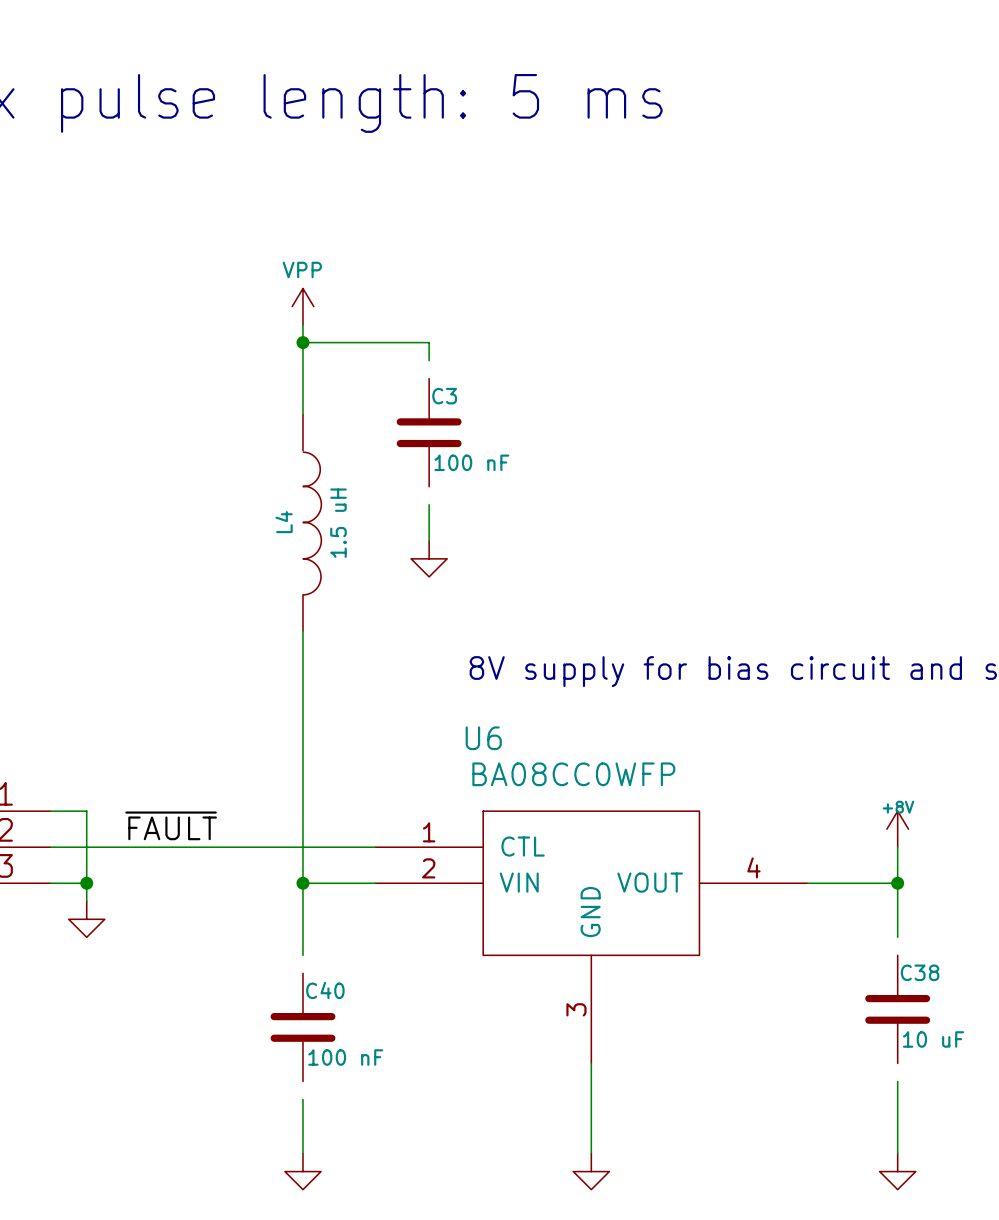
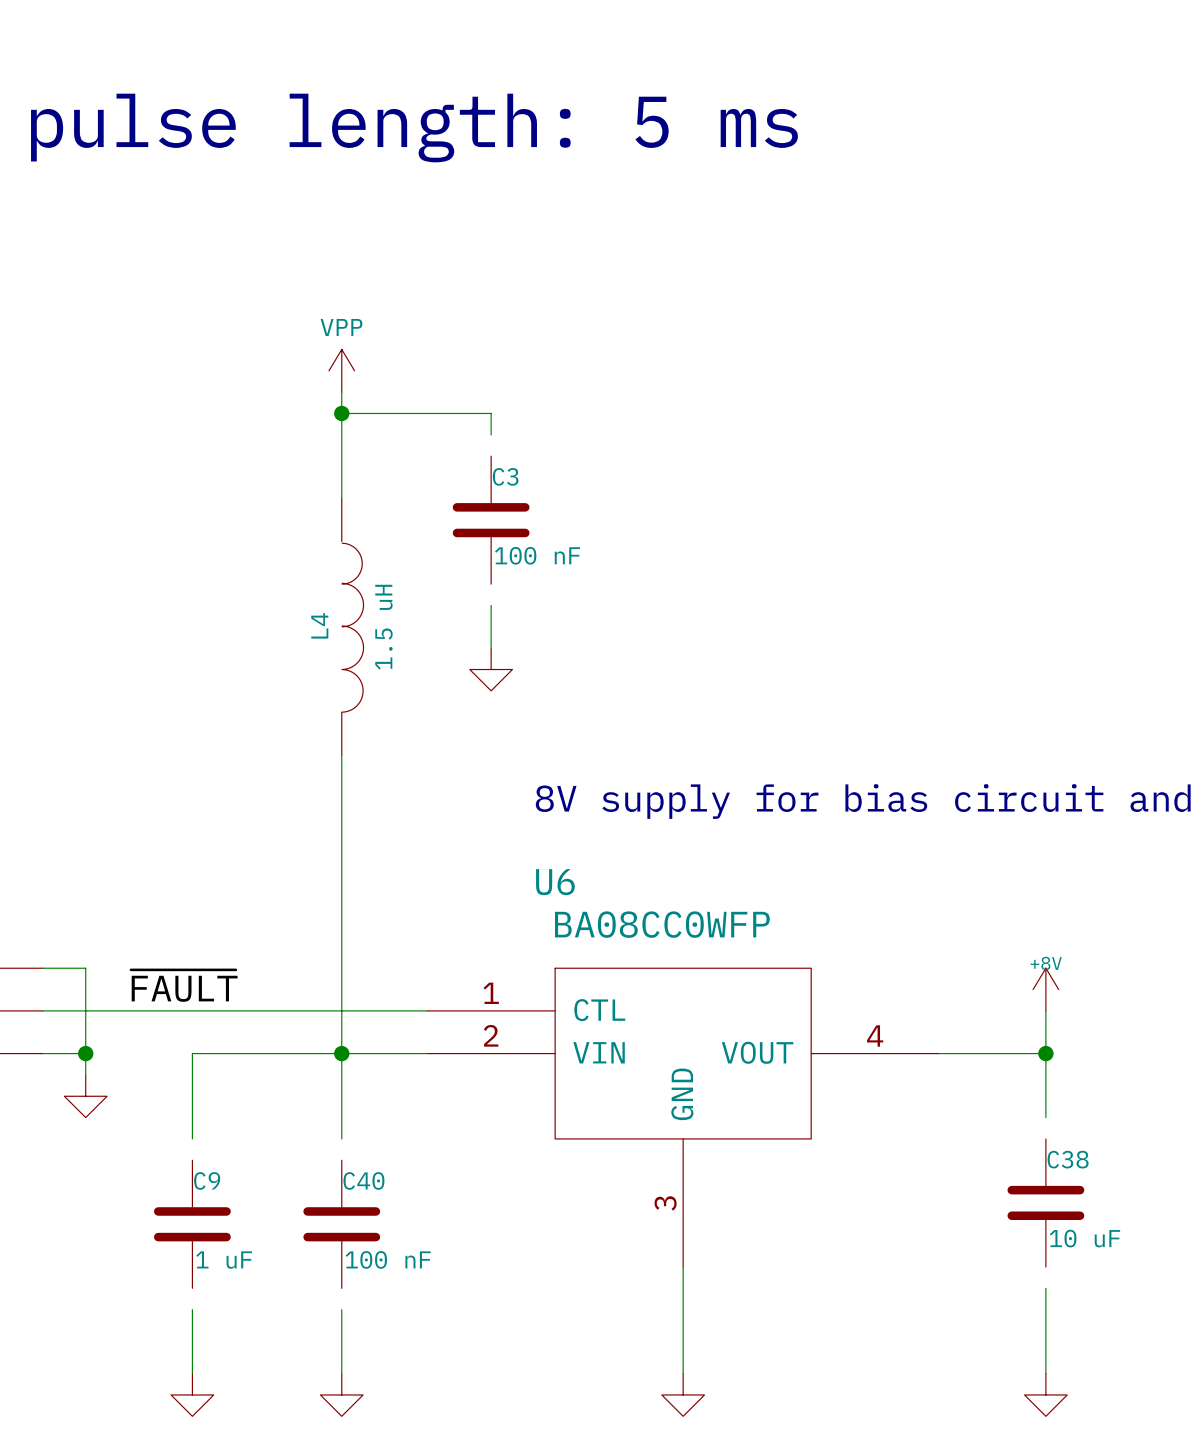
wire: none -> (341, 1053) (192, 1053) (192, 1138)
C9: none -> 1 uF (192, 1224)
wire: none -> (192, 1309) (192, 1373)
power symbol: none -> (192, 1394)

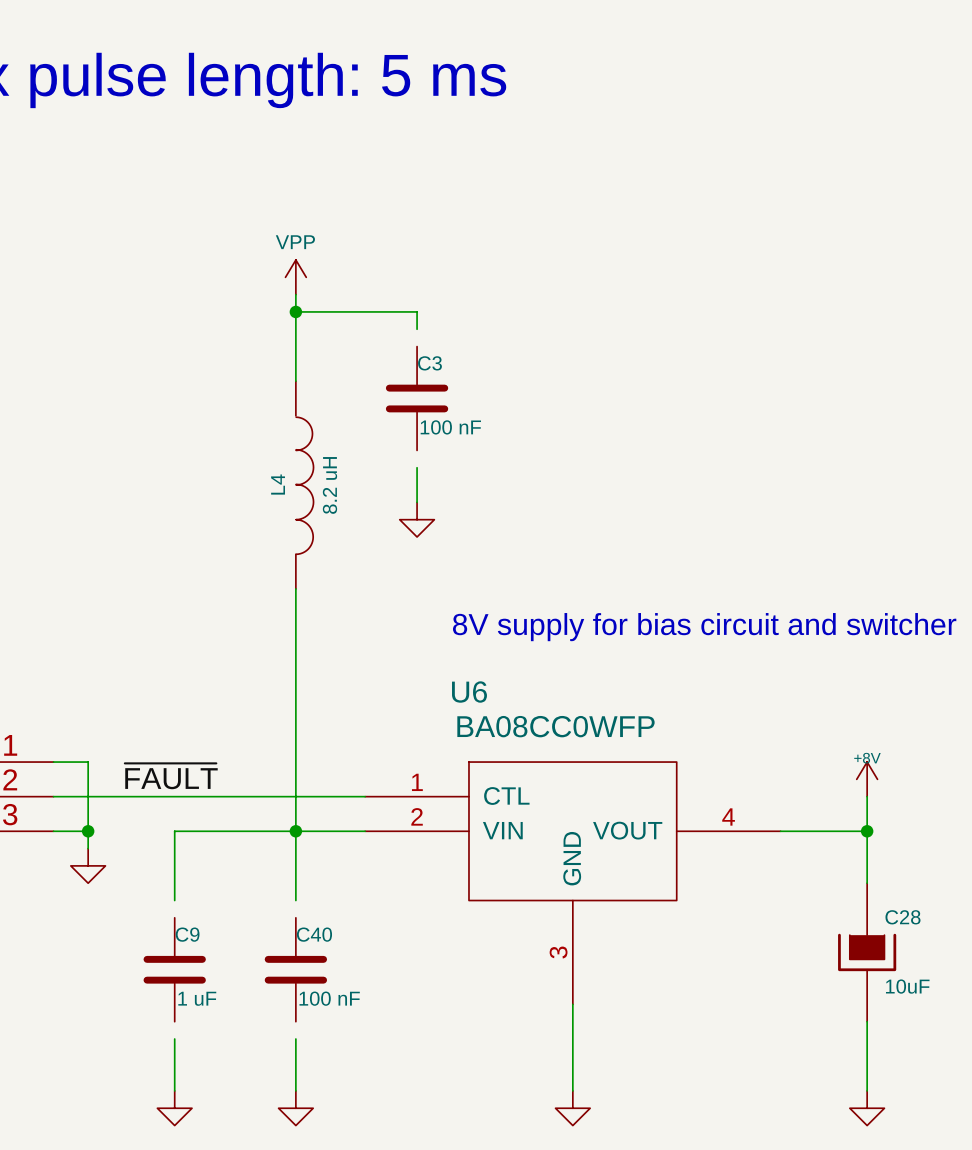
L4 value: 1.5 uH (383, 627) -> 8.2 uH (329, 485)
C38: 10 uF (1045, 1202) -> none
C28: none -> 10uF (867, 952)

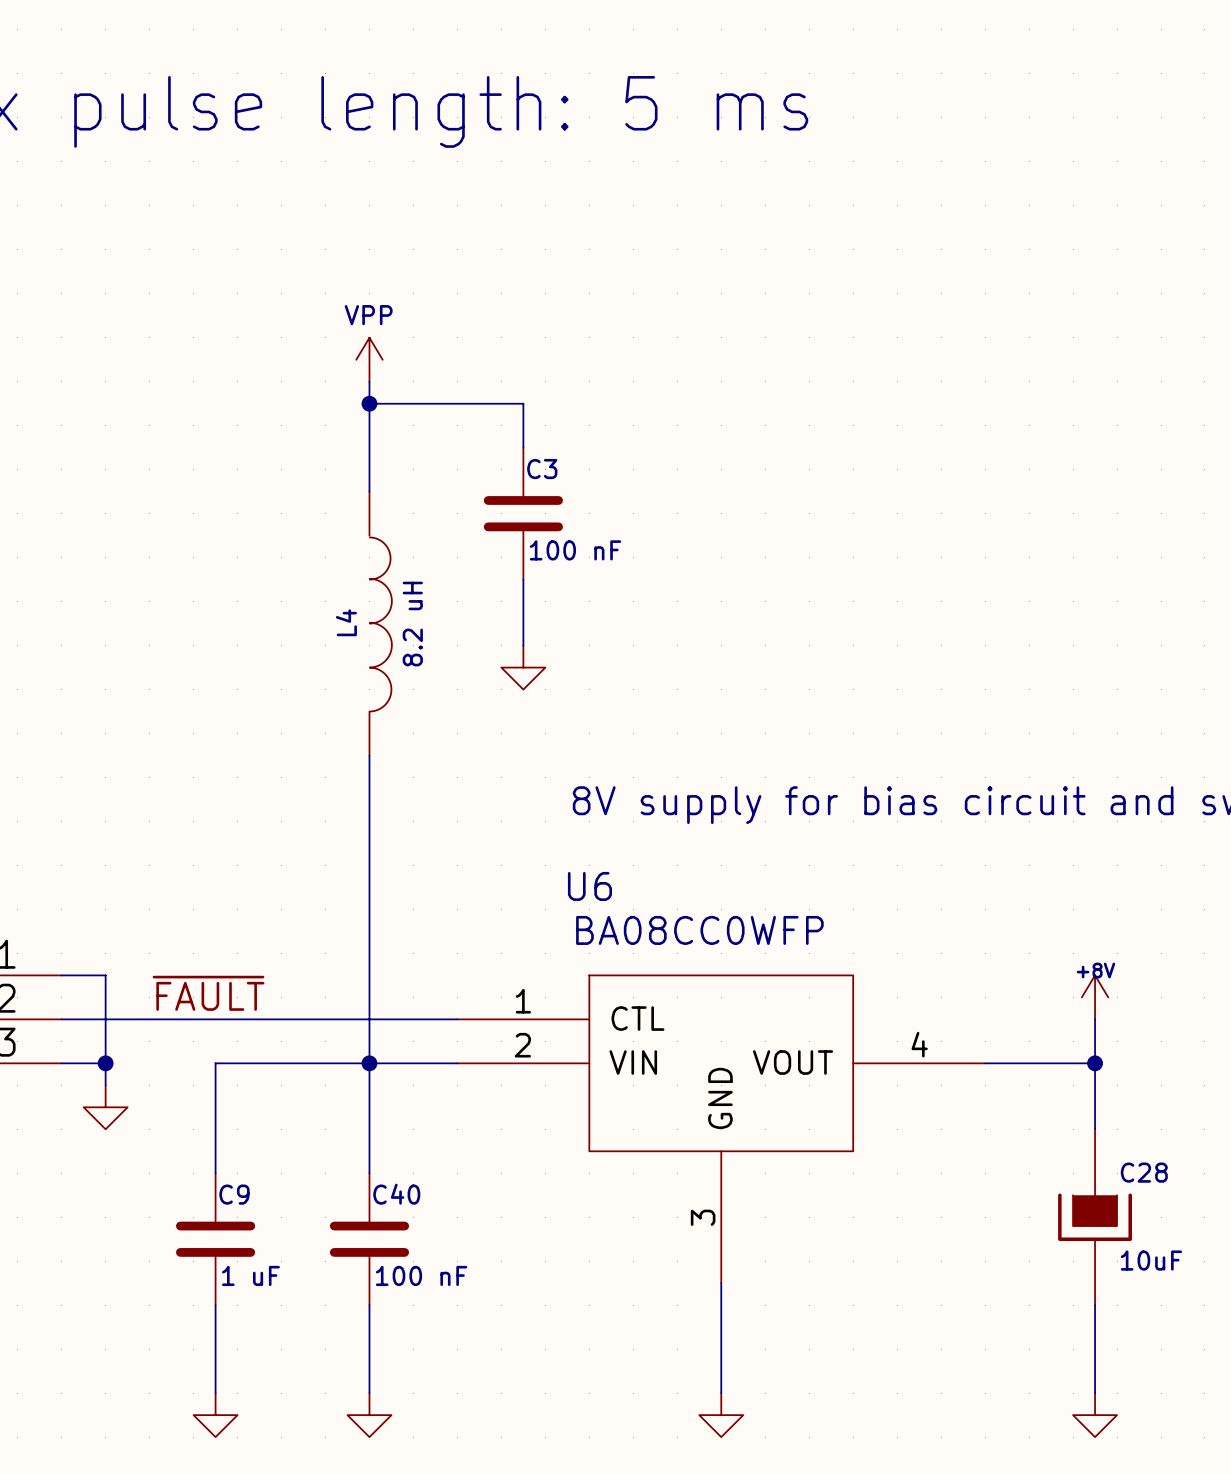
wire: none -> (523, 425) (523, 447)
wire: none -> (523, 579) (523, 601)
wire: none -> (215, 1151) (215, 1173)
wire: none -> (369, 1151) (369, 1173)
wire: none -> (215, 1305) (215, 1327)
wire: none -> (369, 1305) (369, 1327)

